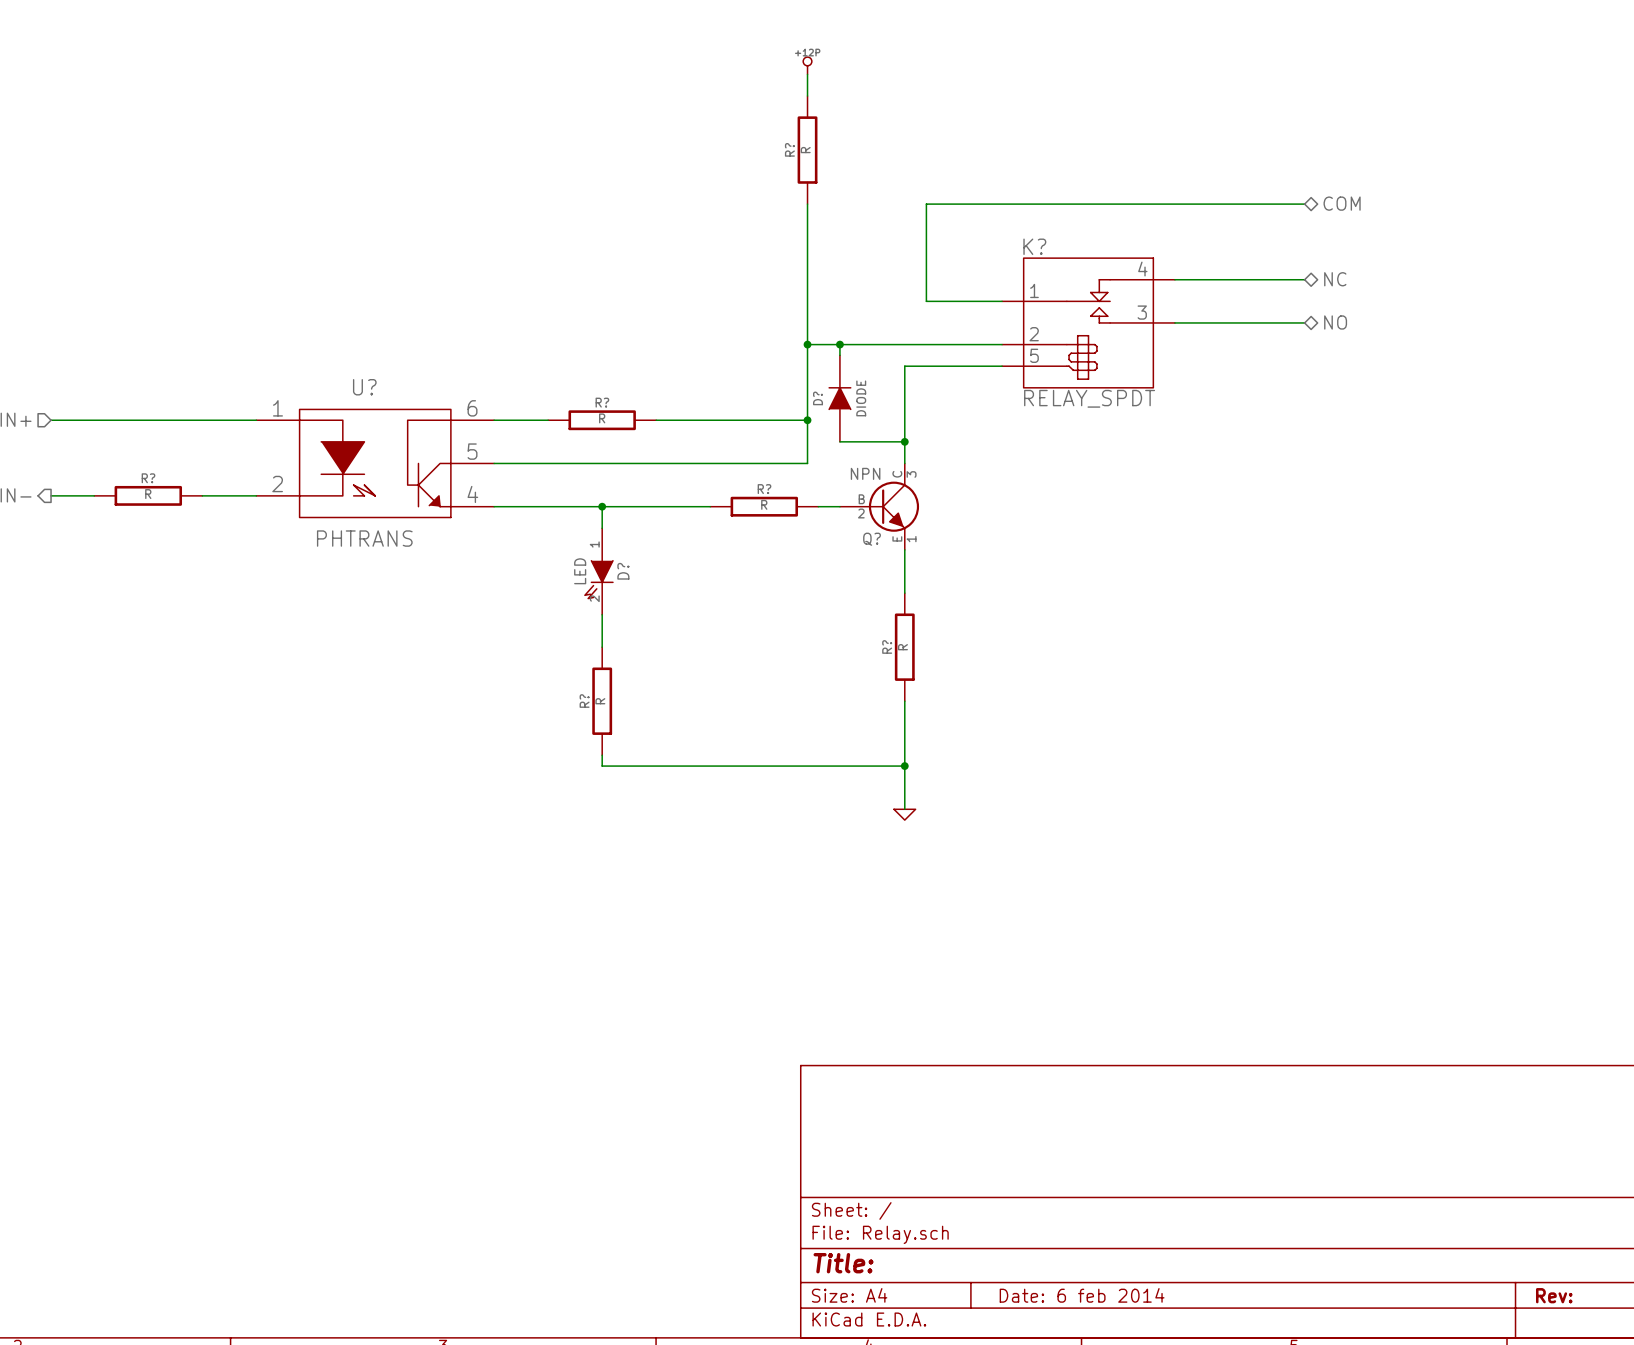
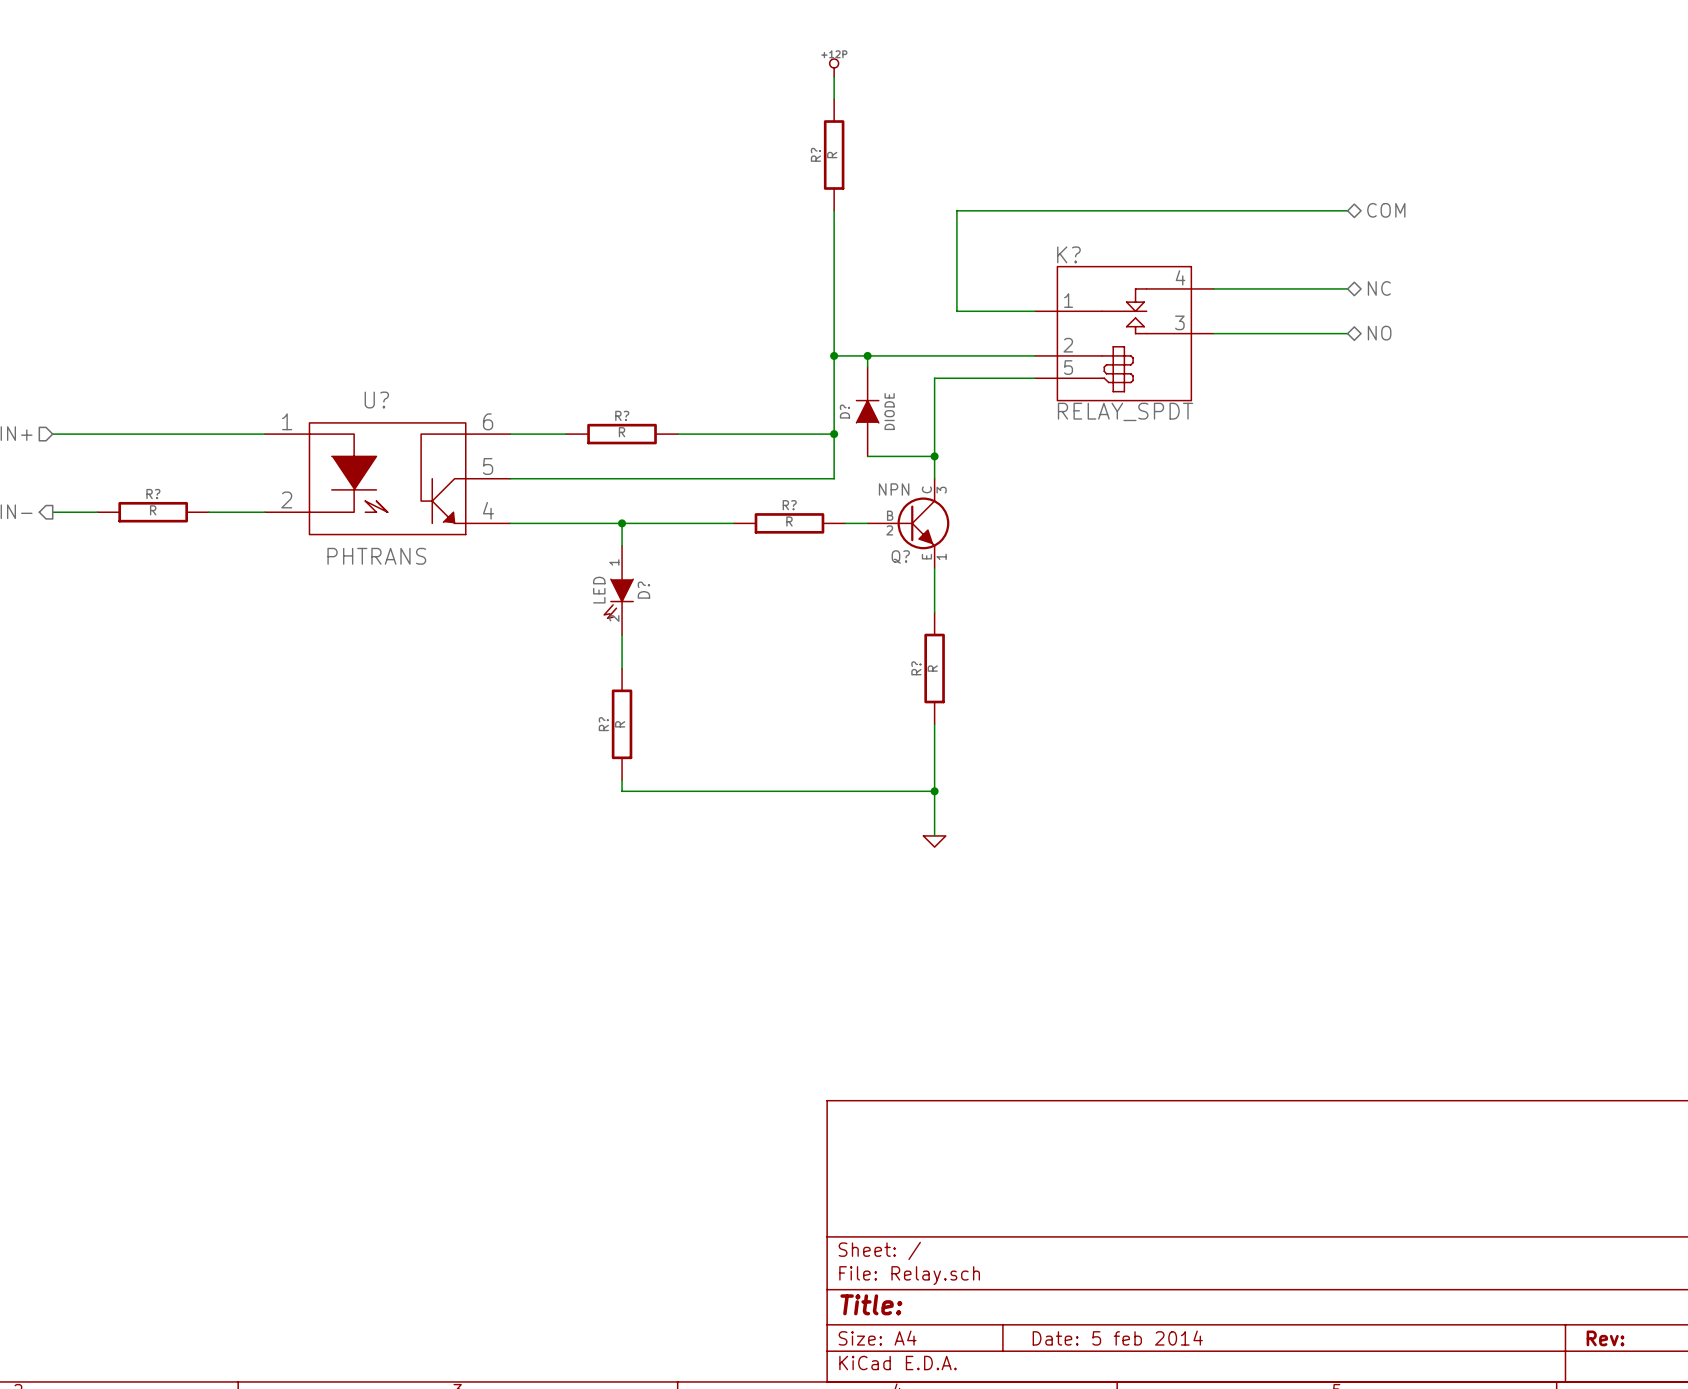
title block: Date: 6 feb 2014 (1082, 1295) -> Date: 5 feb 2014 (1117, 1338)

